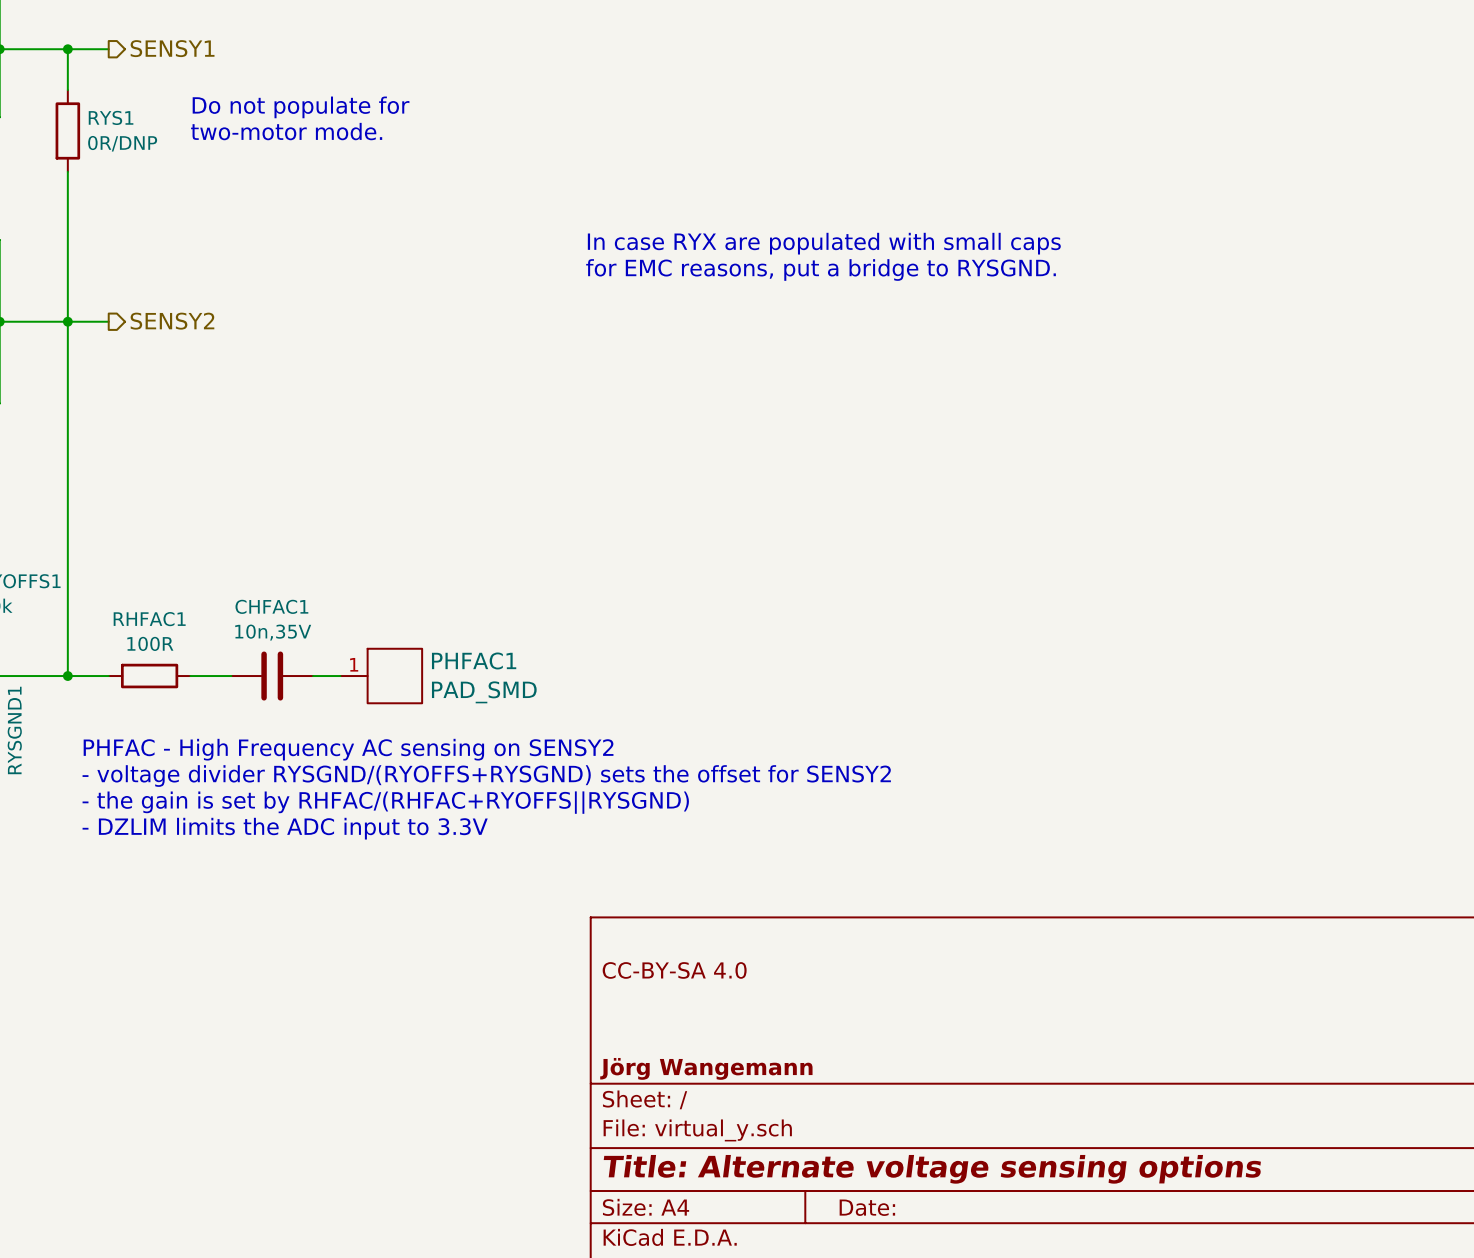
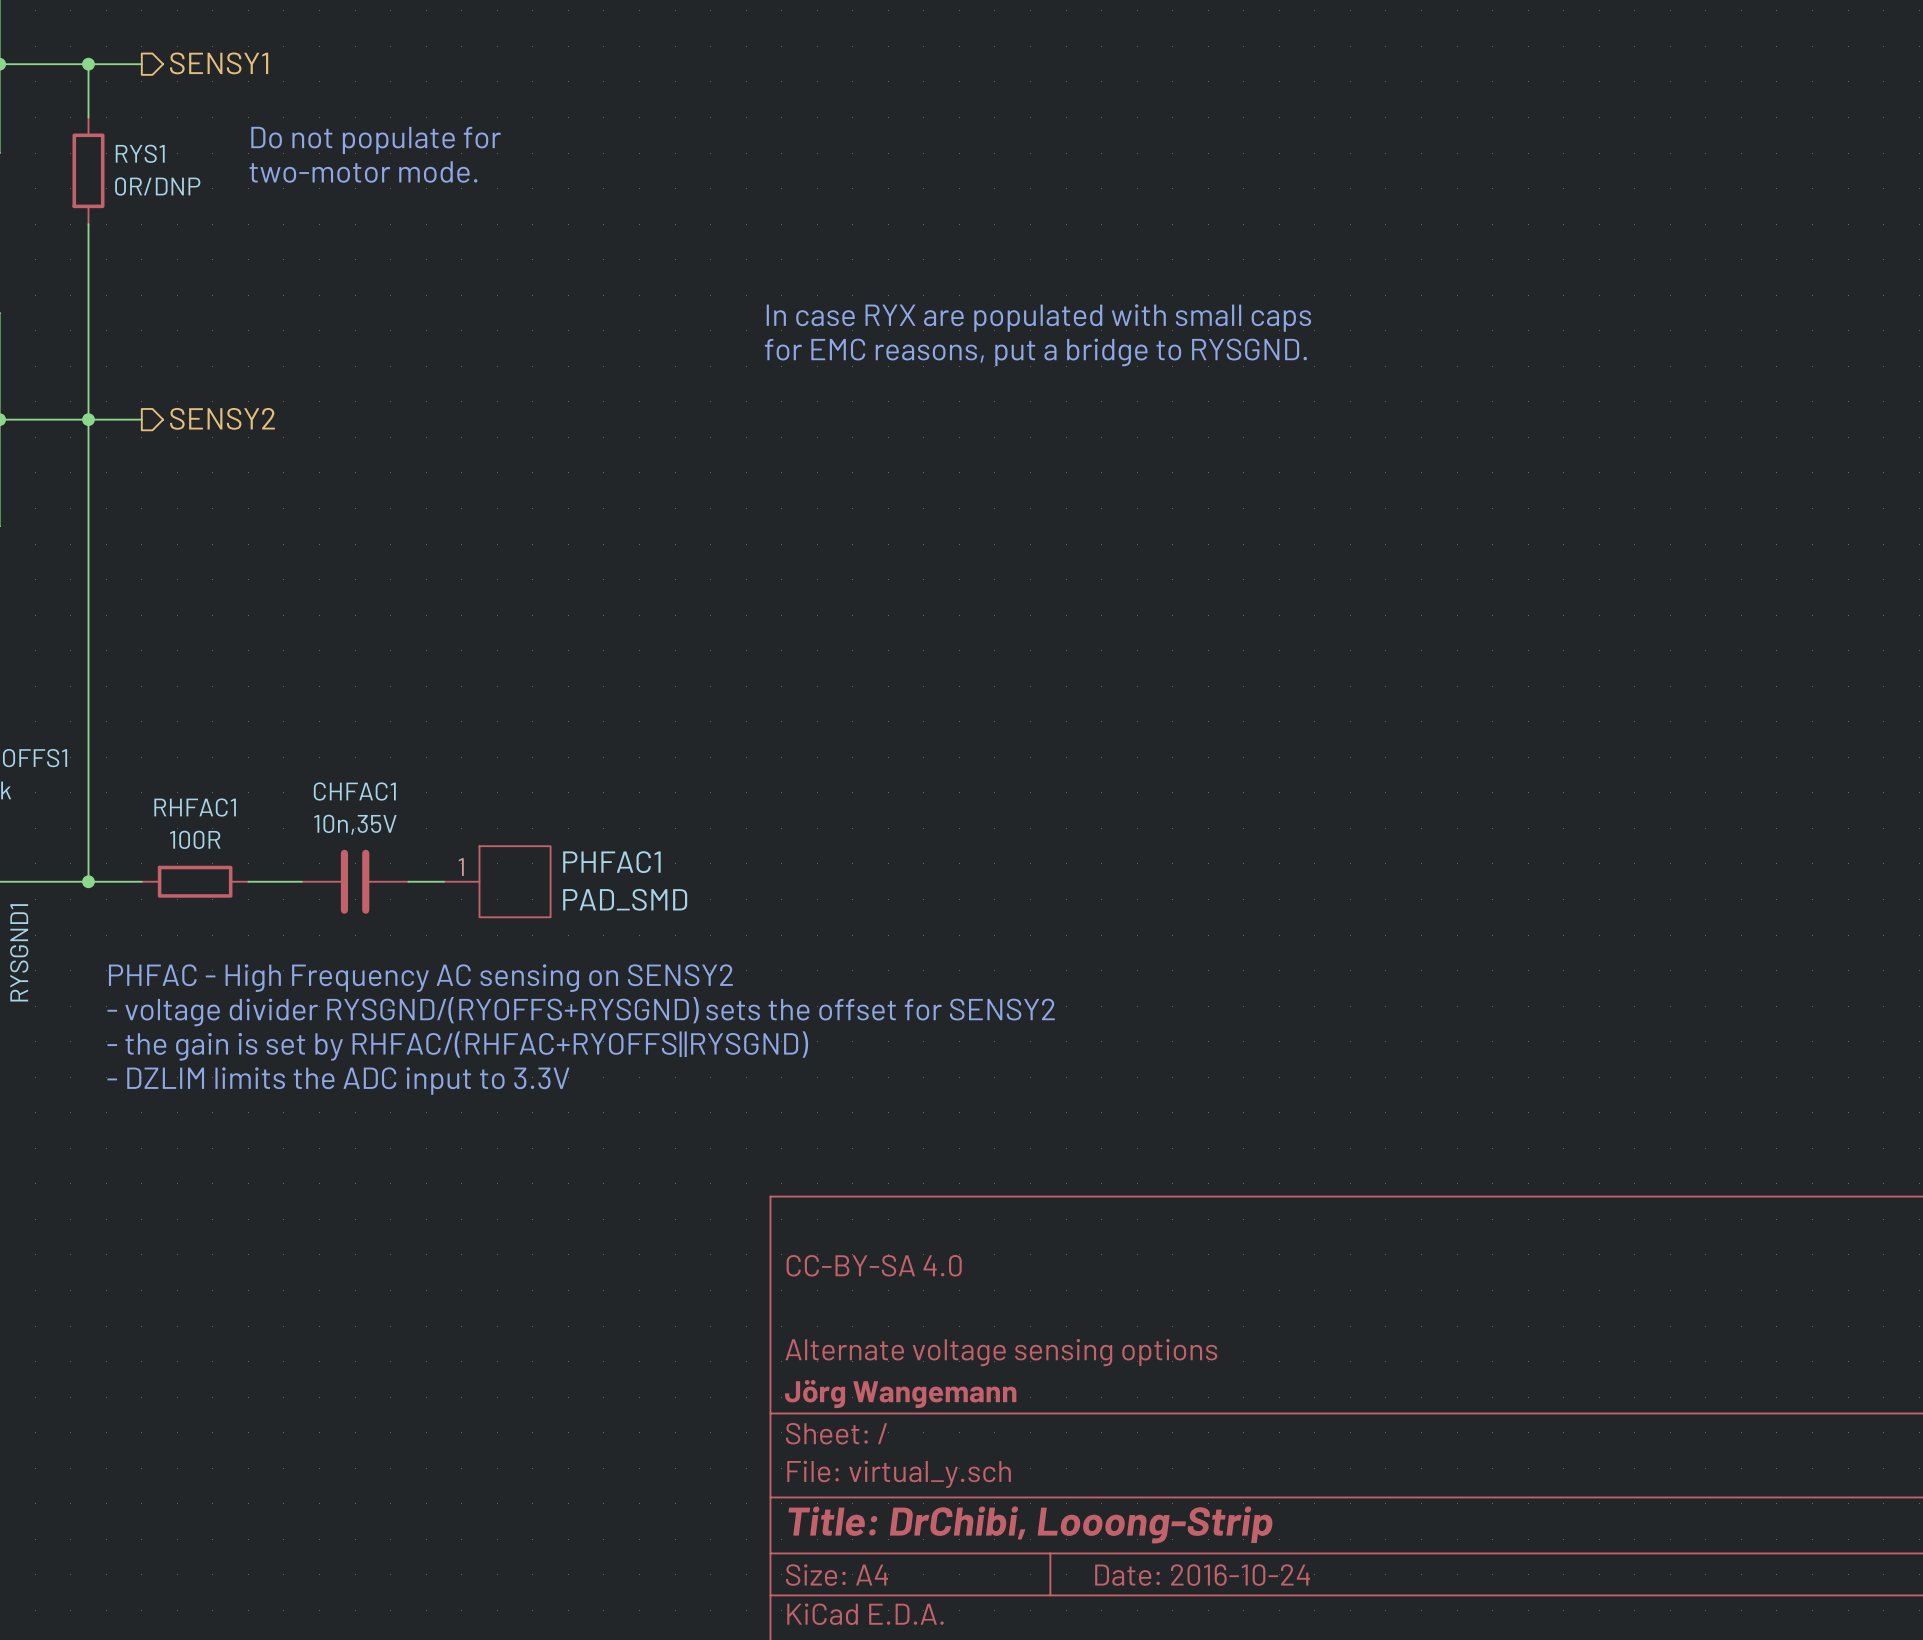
title block: none -> Alternate voltage sensing options (1001, 1352)
title block: Title: Alternate voltage sensing options (932, 1169) -> Title: DrChibi, Looong-Strip (1030, 1524)
title block: Date: (867, 1207) -> Date: 2016-10-24 (1202, 1575)

